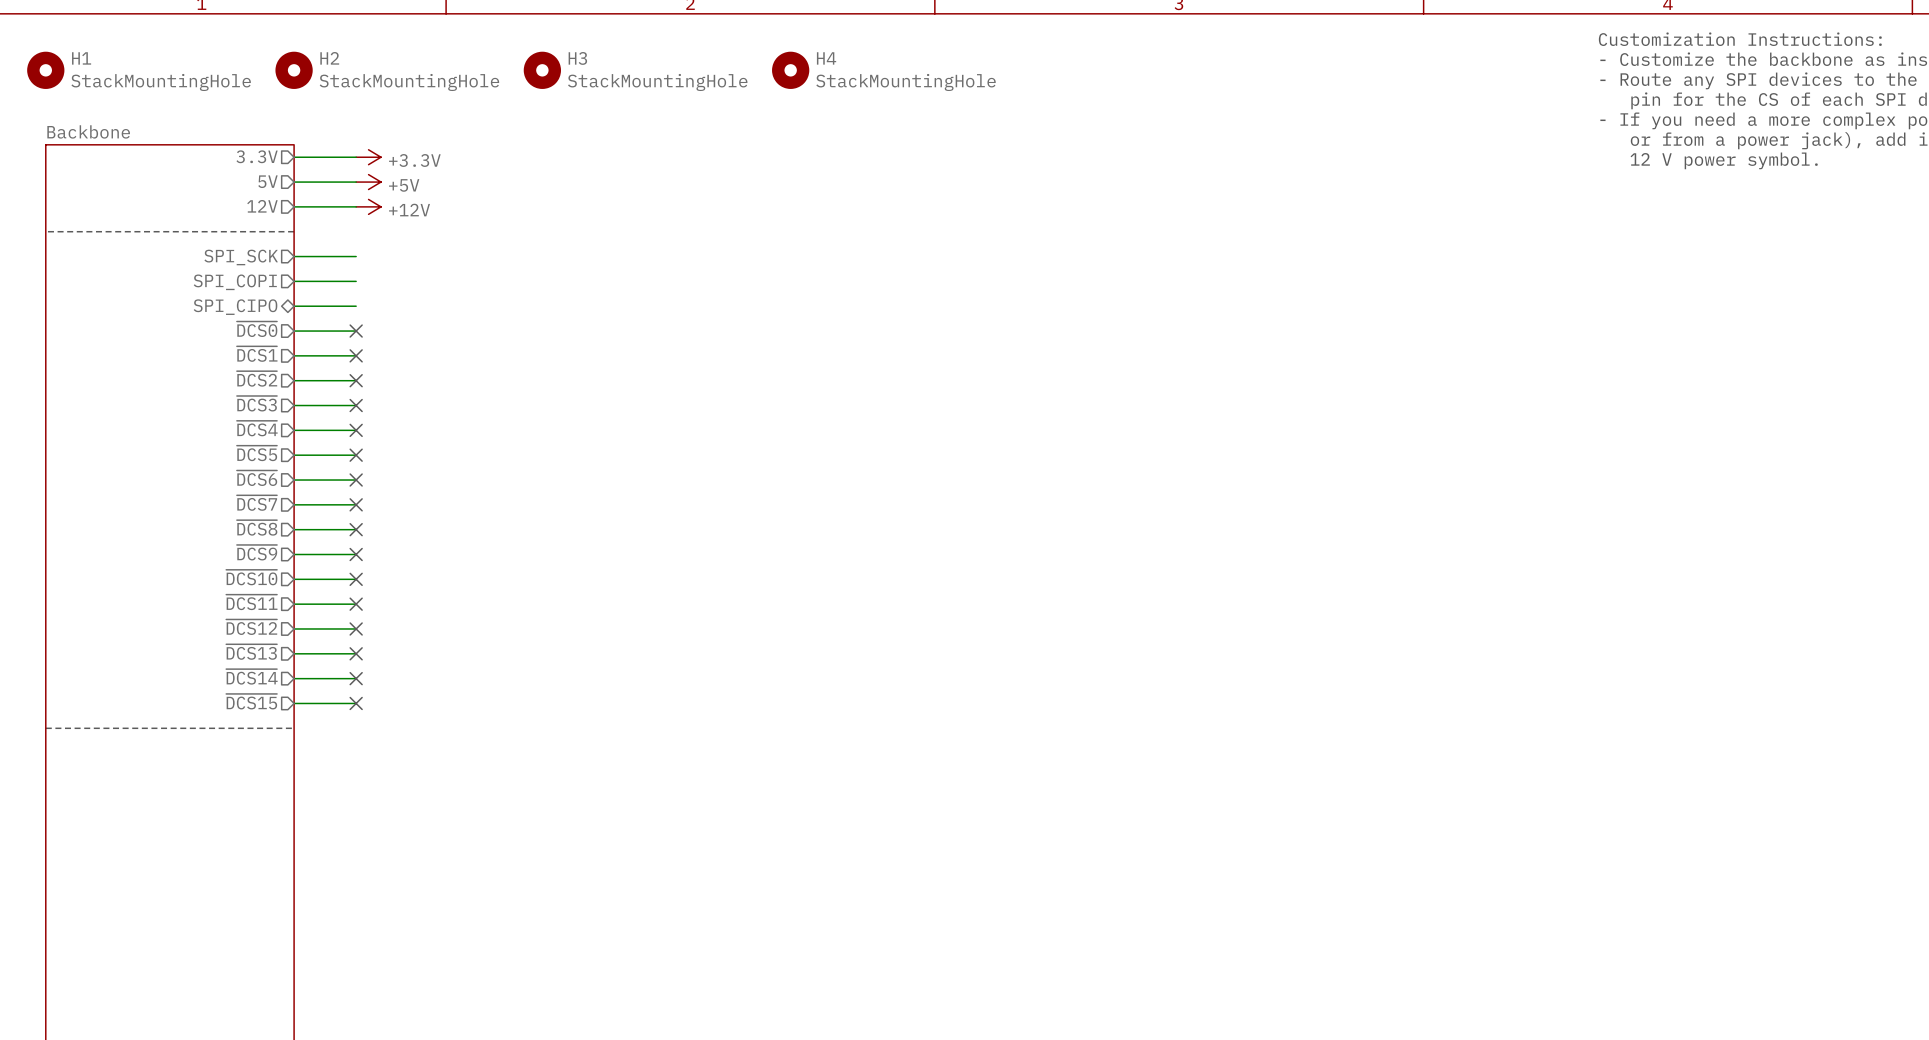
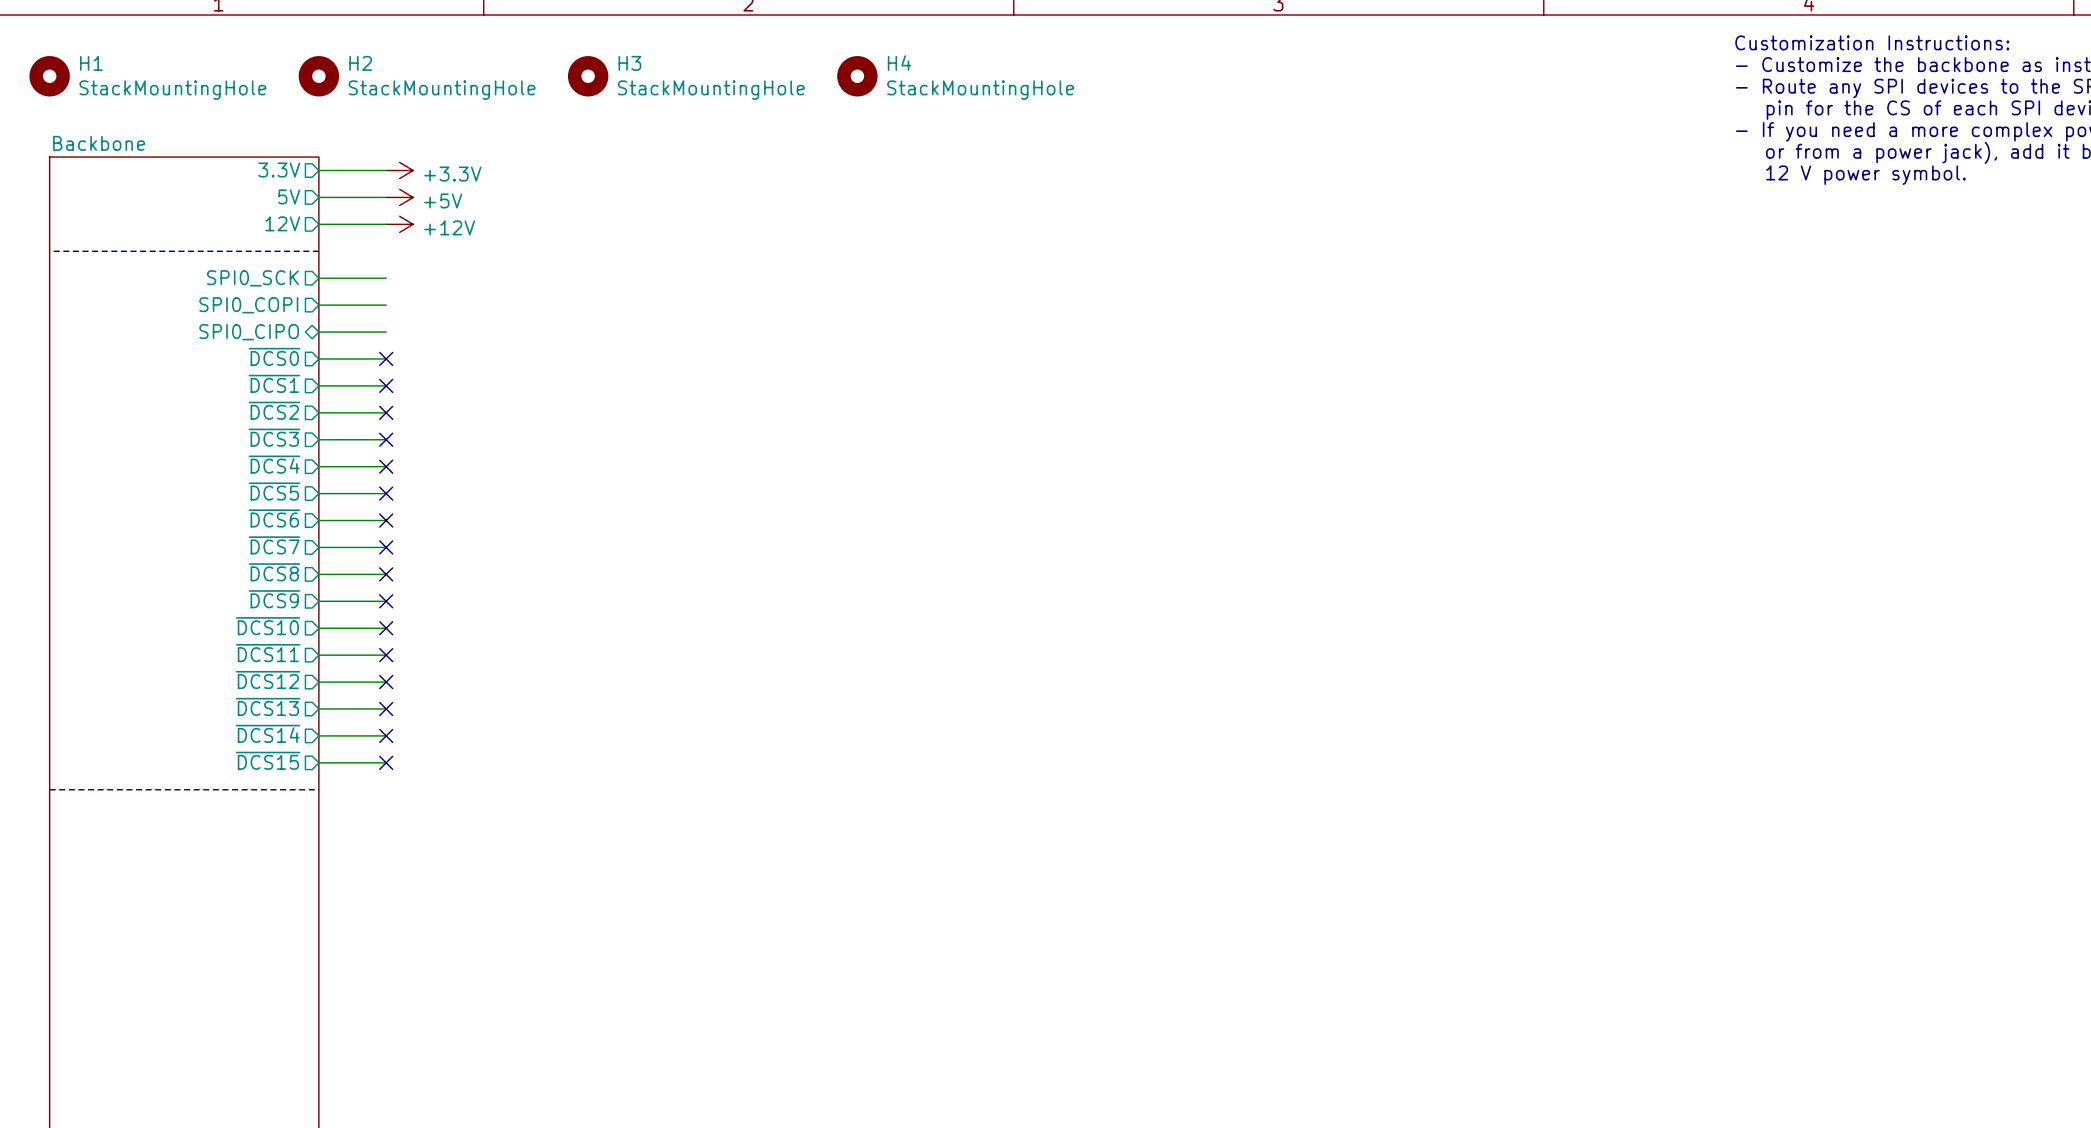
sheet pin: SPI_SCK (241, 257) -> SPI0_SCK (252, 278)
sheet pin: SPI_COPI (235, 282) -> SPI0_COPI (248, 305)
sheet pin: SPI_CIPO (235, 307) -> SPI0_CIPO (249, 332)

